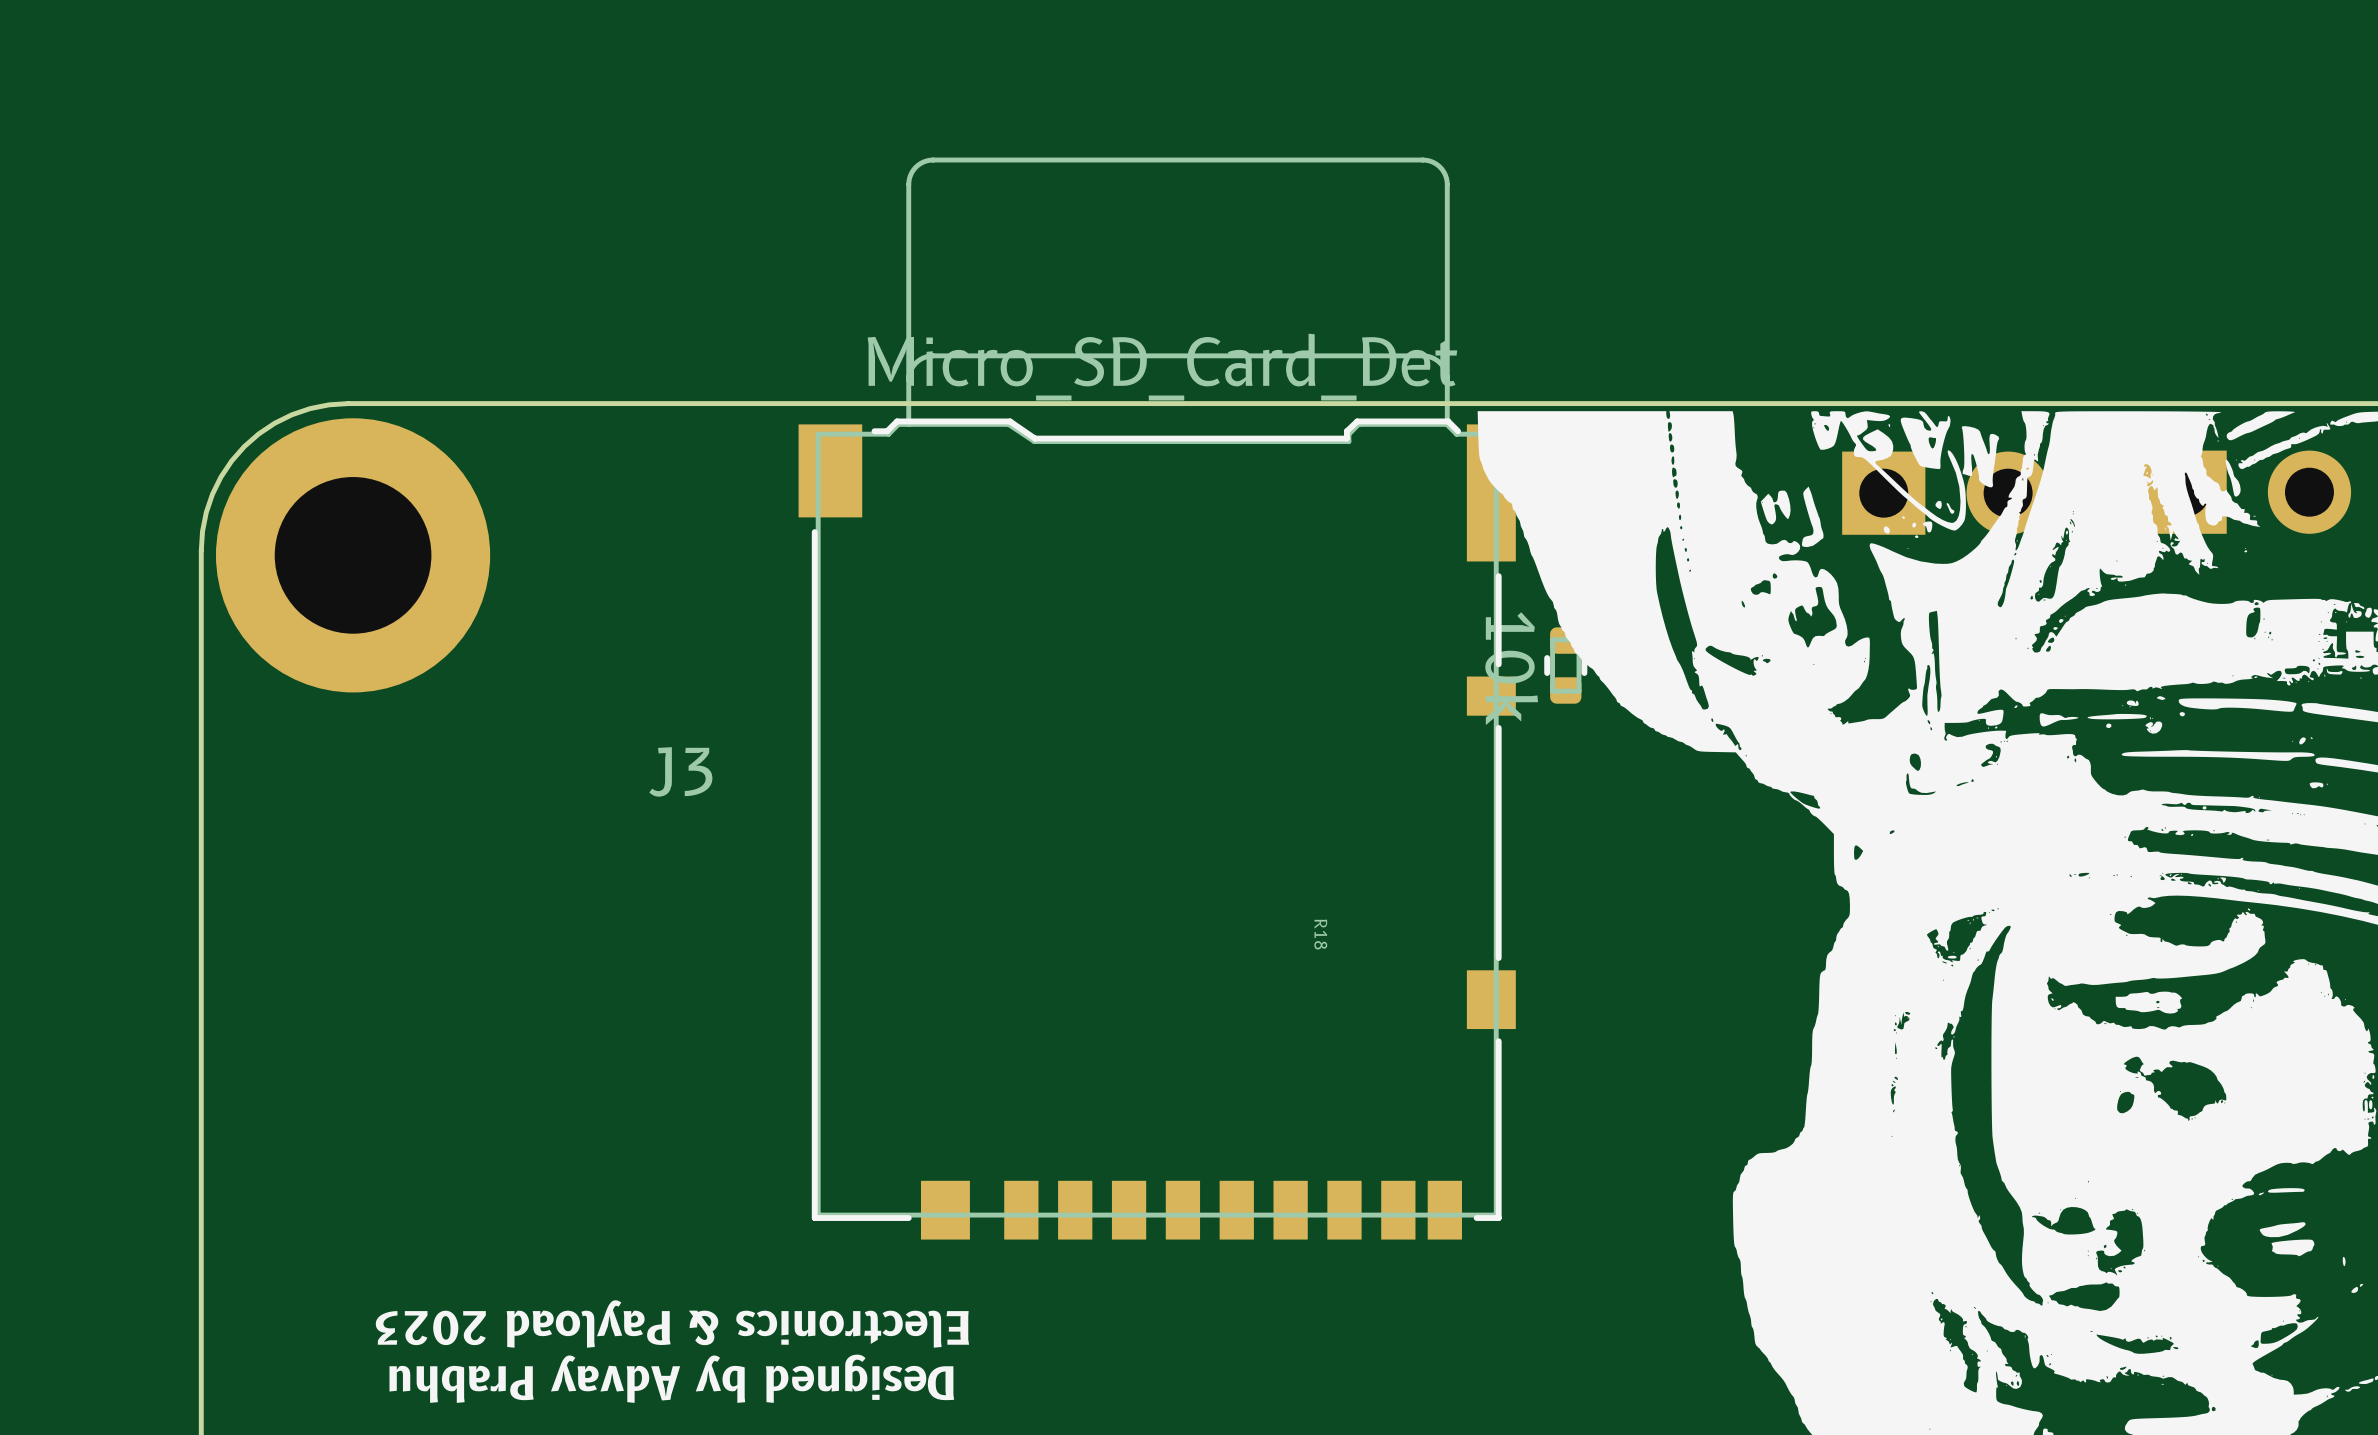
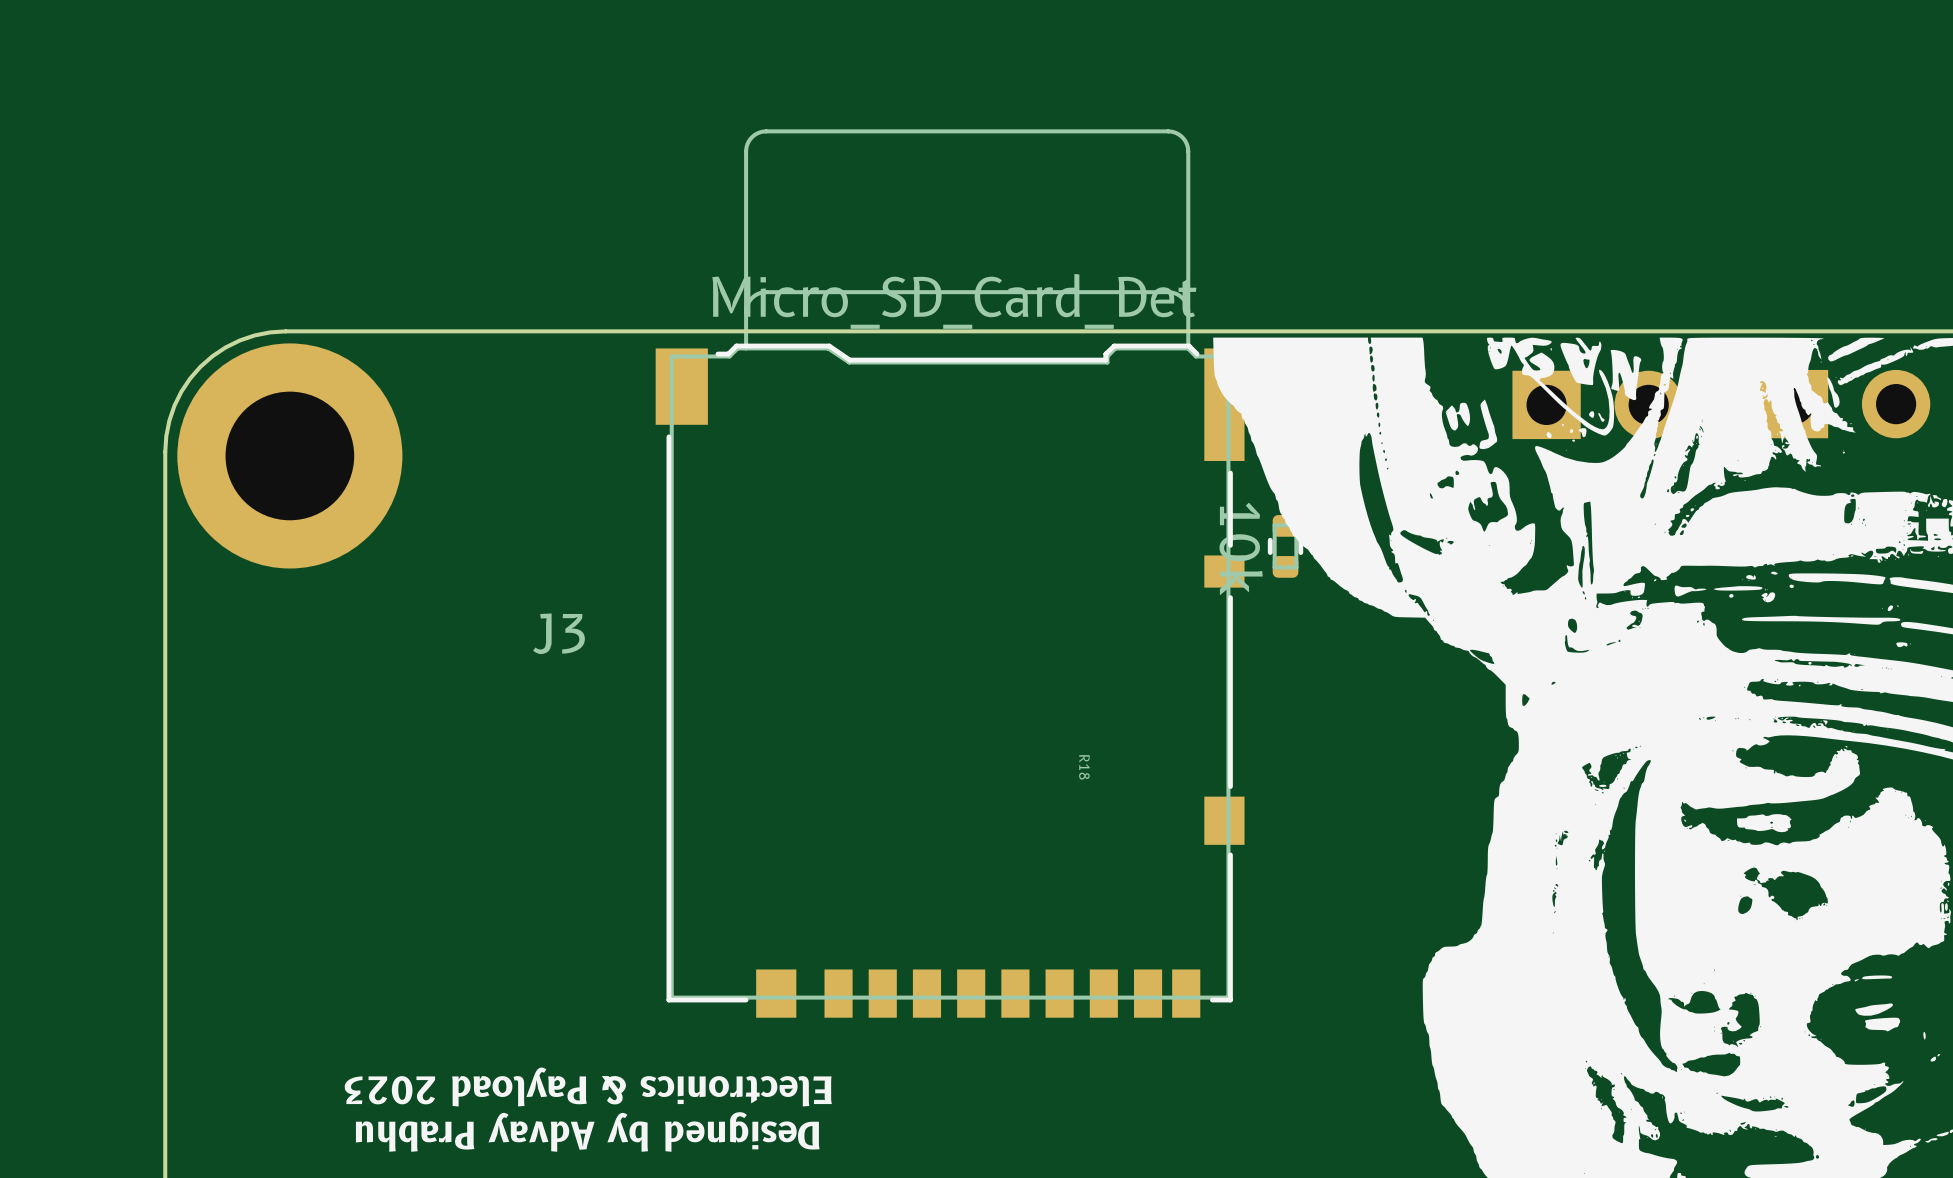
text position: Electronics & Payload 2023 (672, 1324) -> Electronics & Payload 2023 (588, 1087)
text position: Designed by Advay Prabhu (671, 1378) -> Designed by Advay Prabhu (587, 1131)

